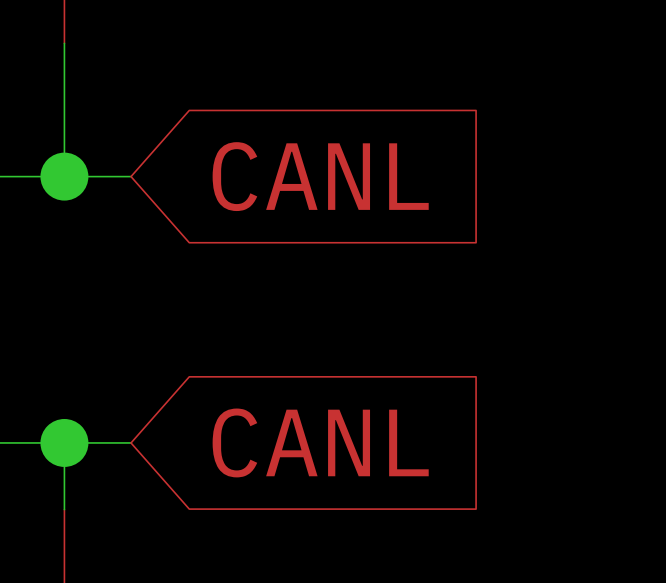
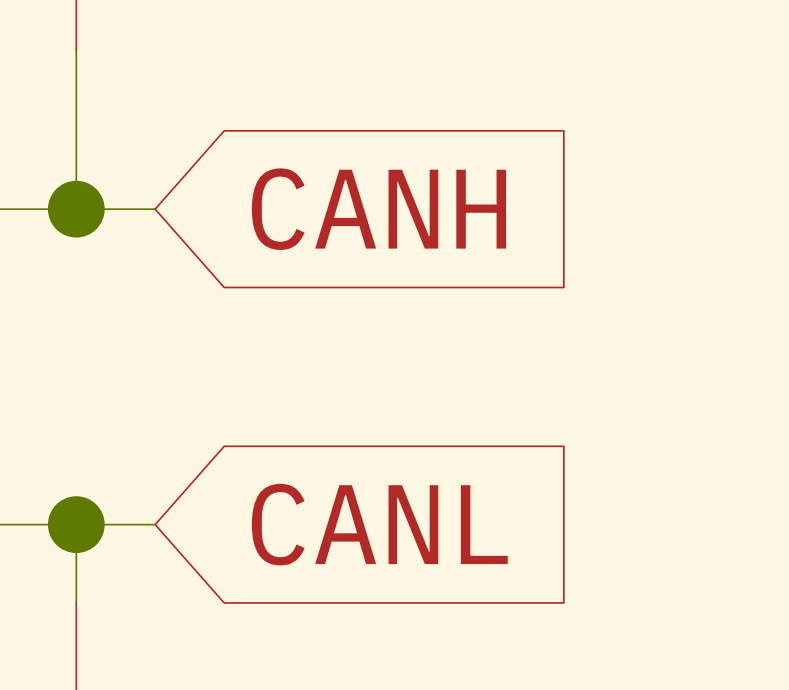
global label: CANL (320, 176) -> CANH (378, 209)

